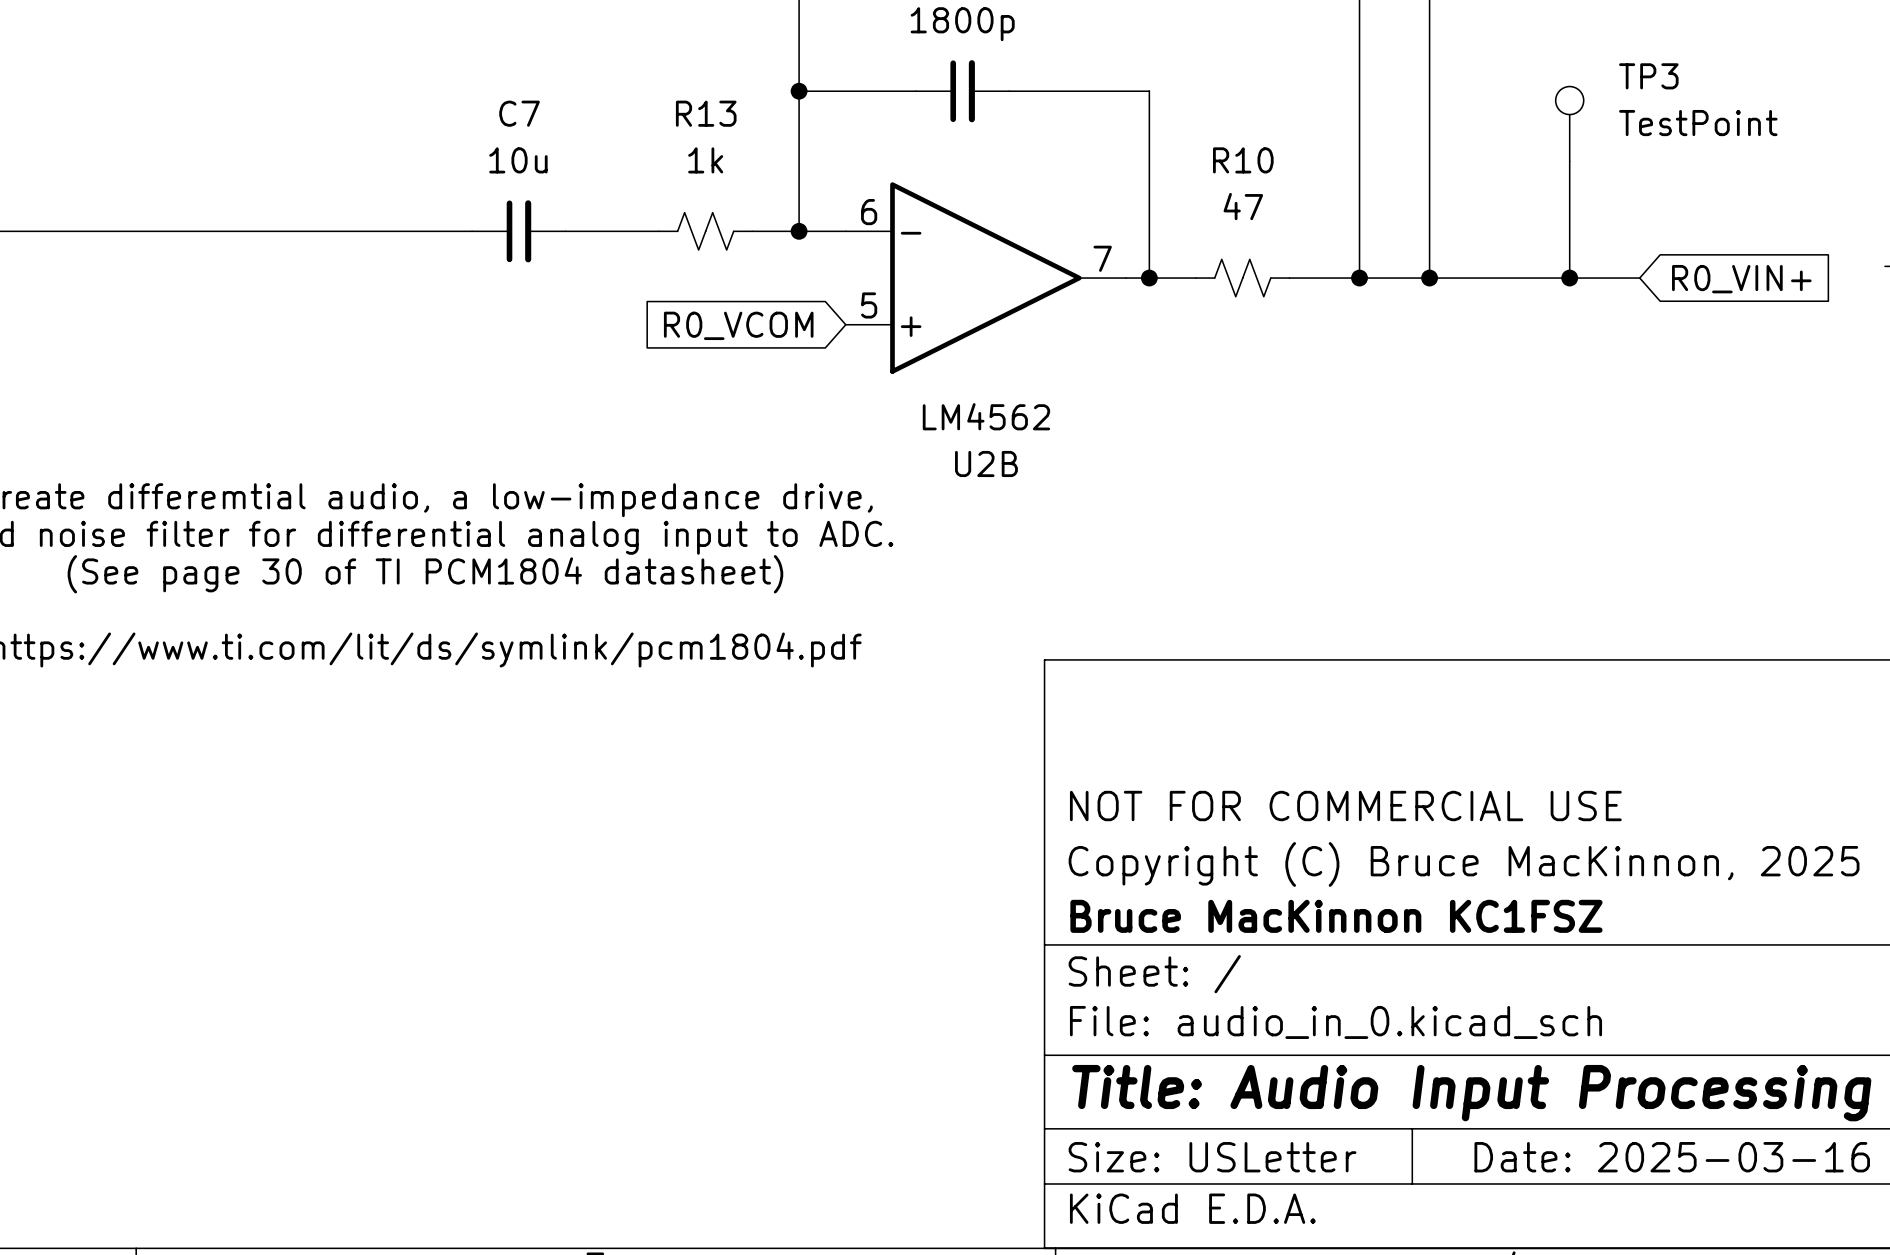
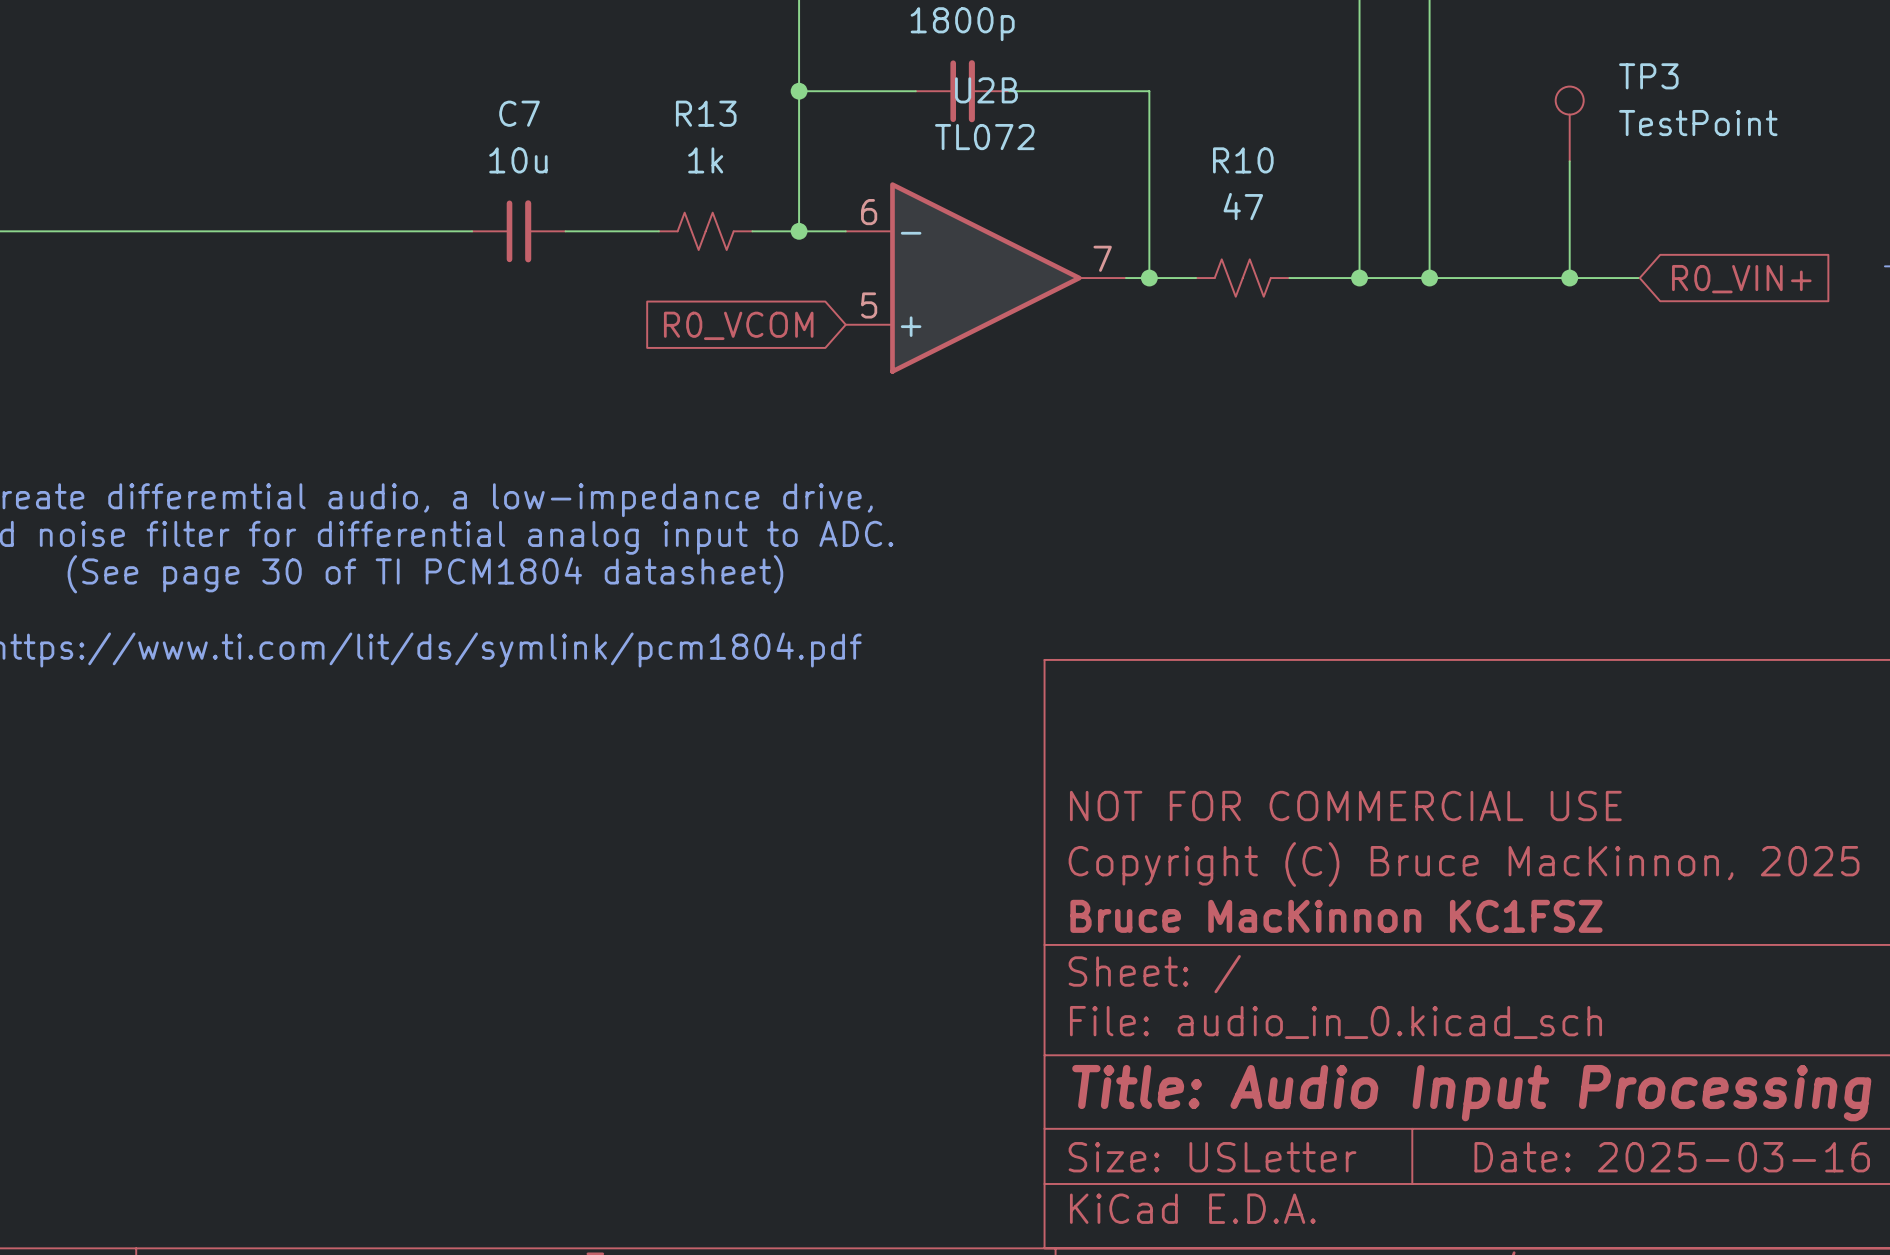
U2B value: LM4562 (986, 416) -> TL072 (984, 137)
U2B name position: U2B (986, 463) -> U2B (986, 90)

